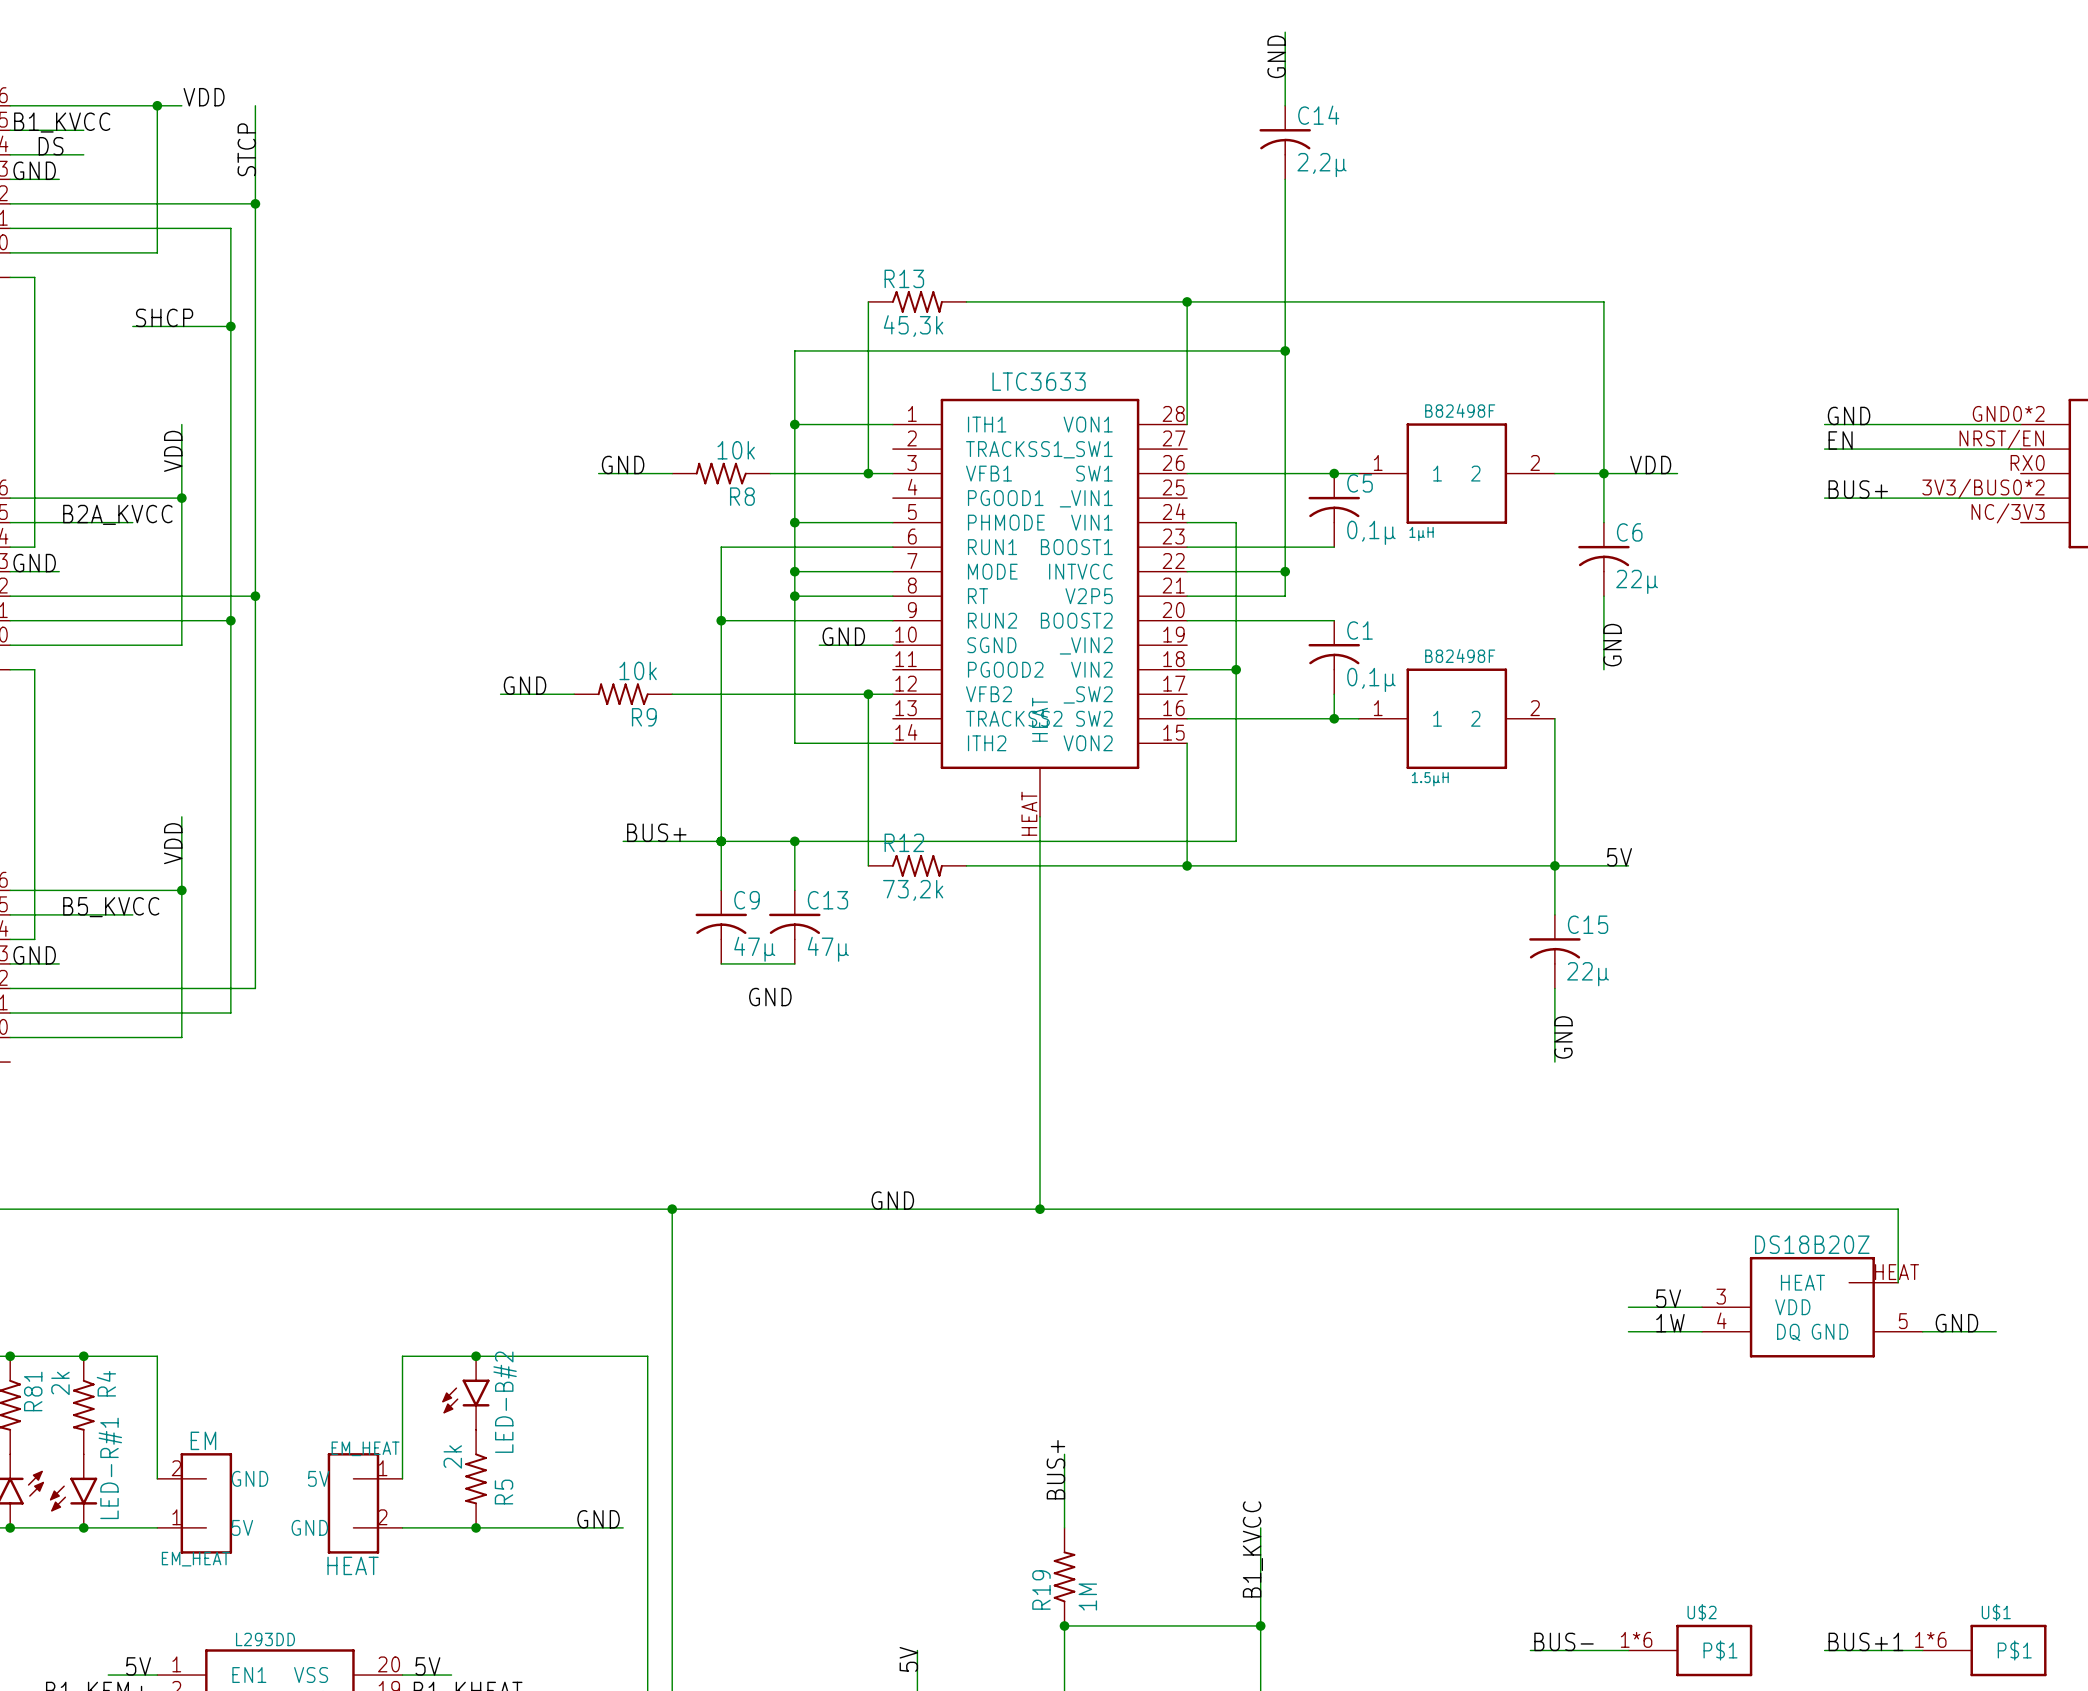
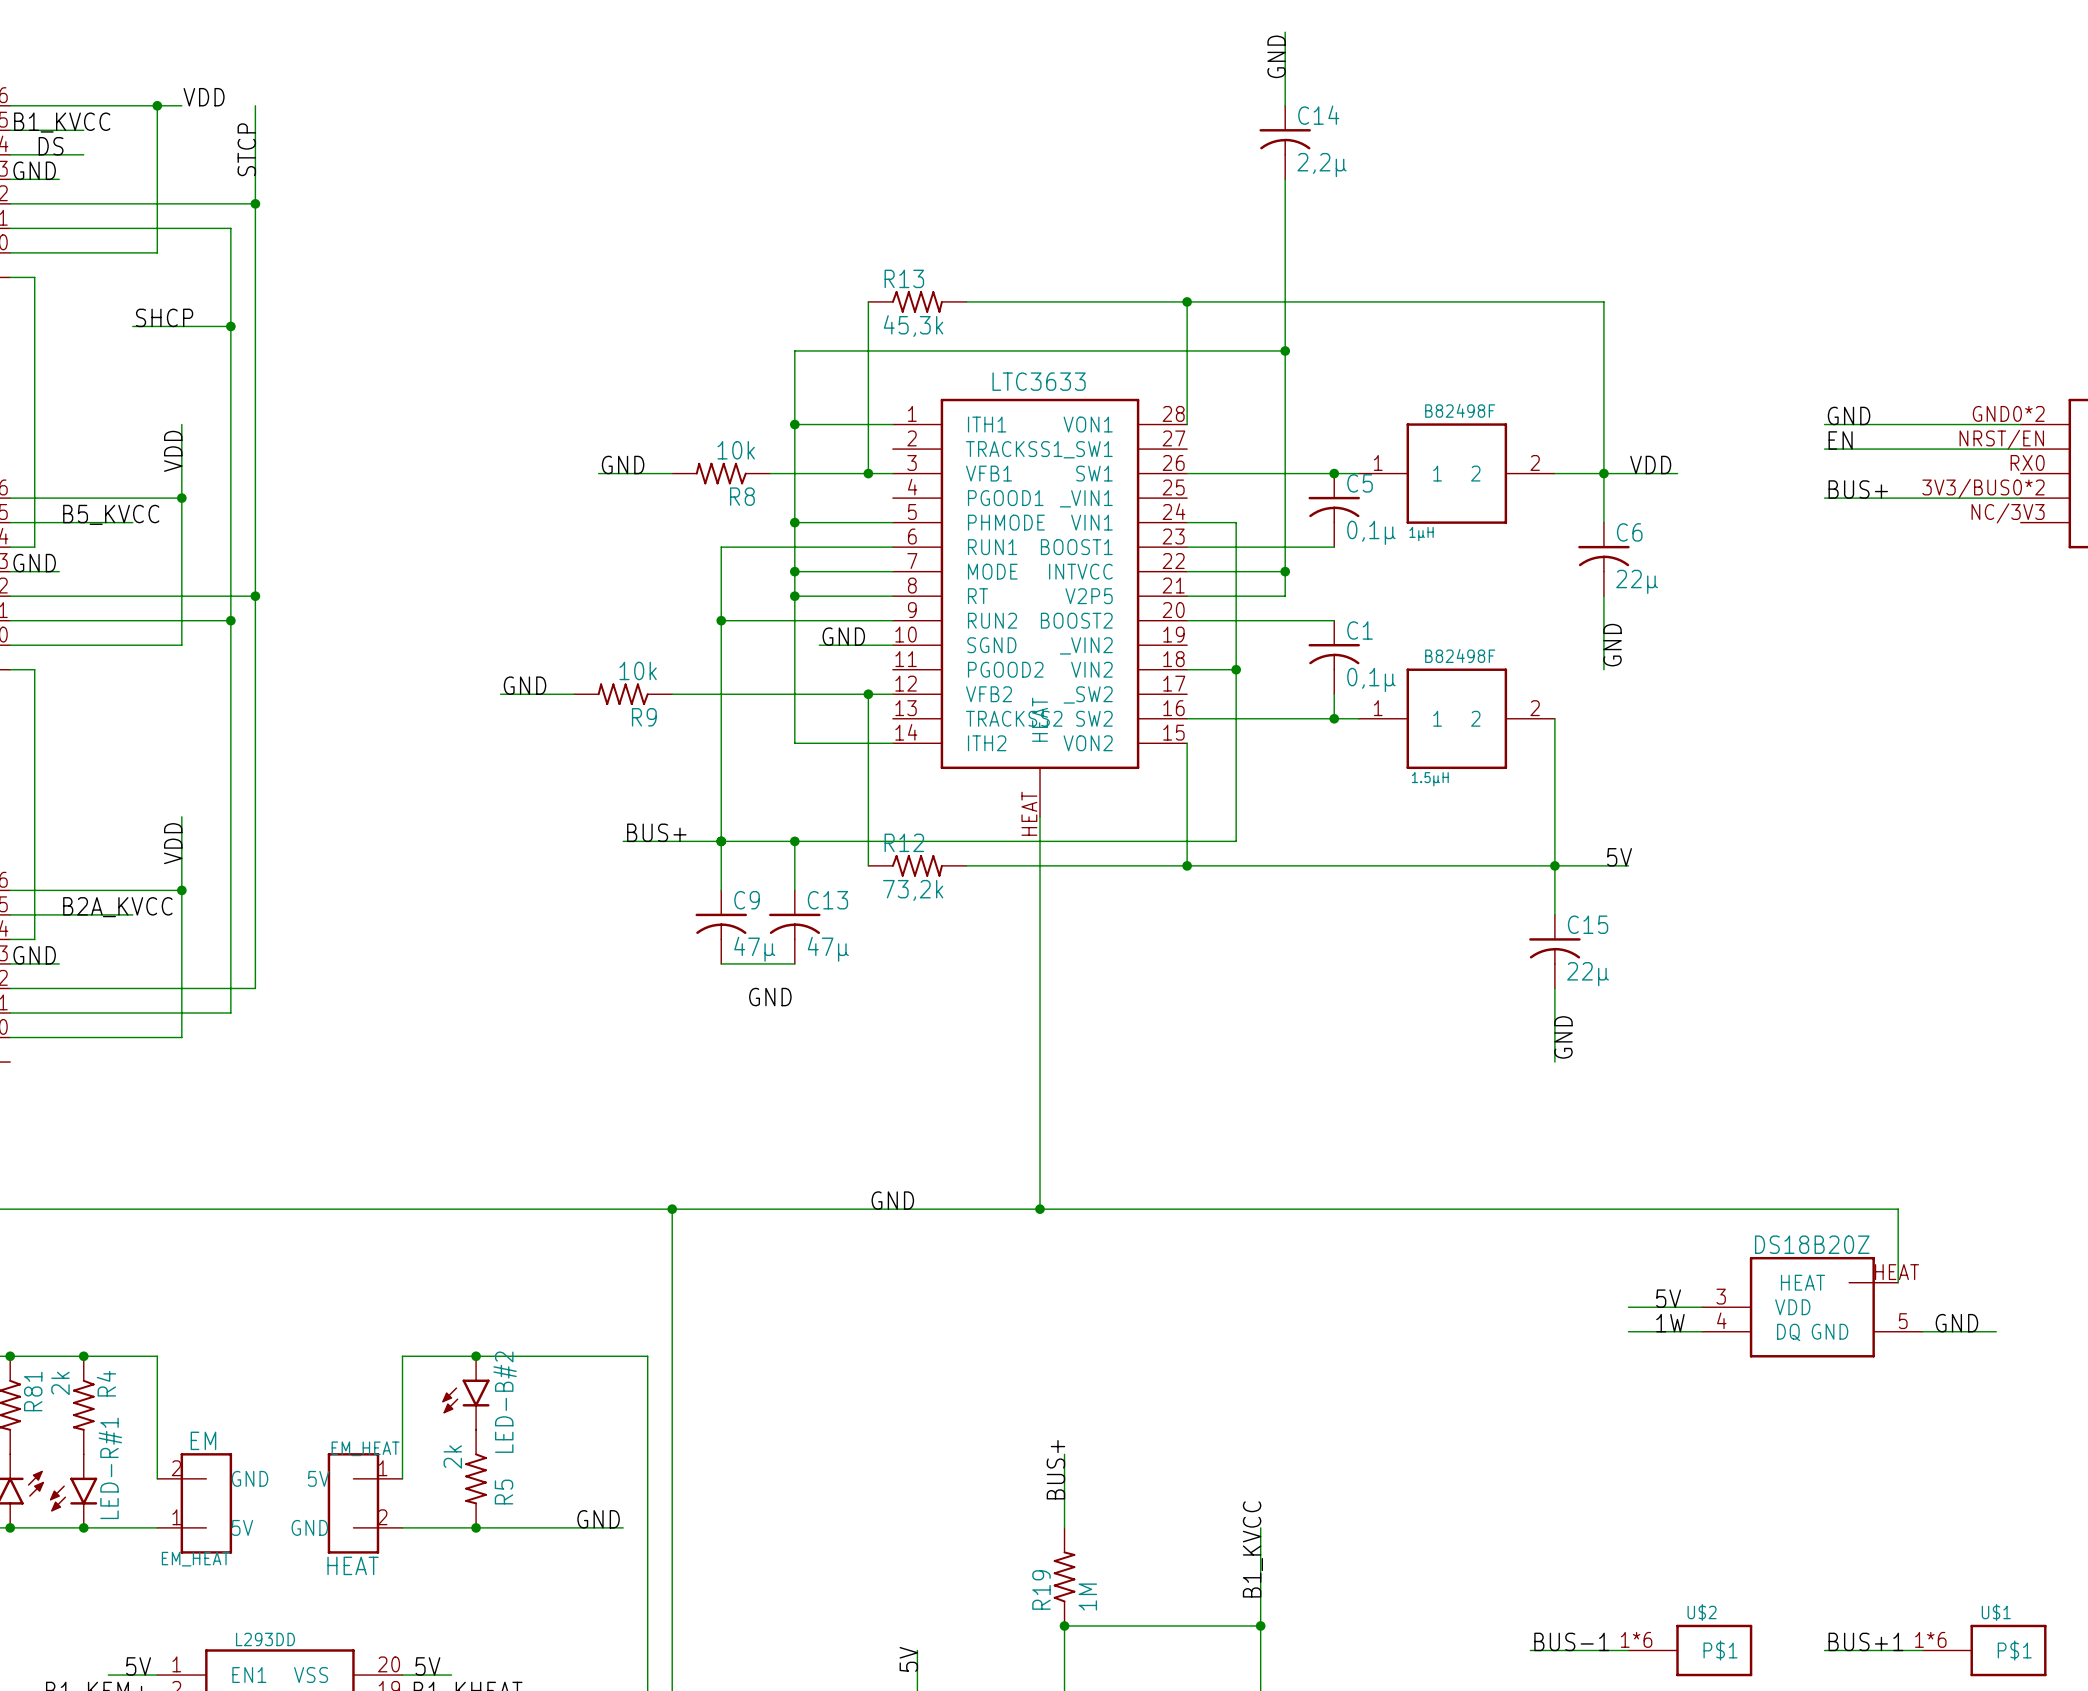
label: B2A_KVCC (117, 514) -> B5_KVCC (111, 514)
label: B5_KVCC (111, 907) -> B2A_KVCC (117, 907)
label: BUS- (1564, 1641) -> BUS-1 (1571, 1641)

